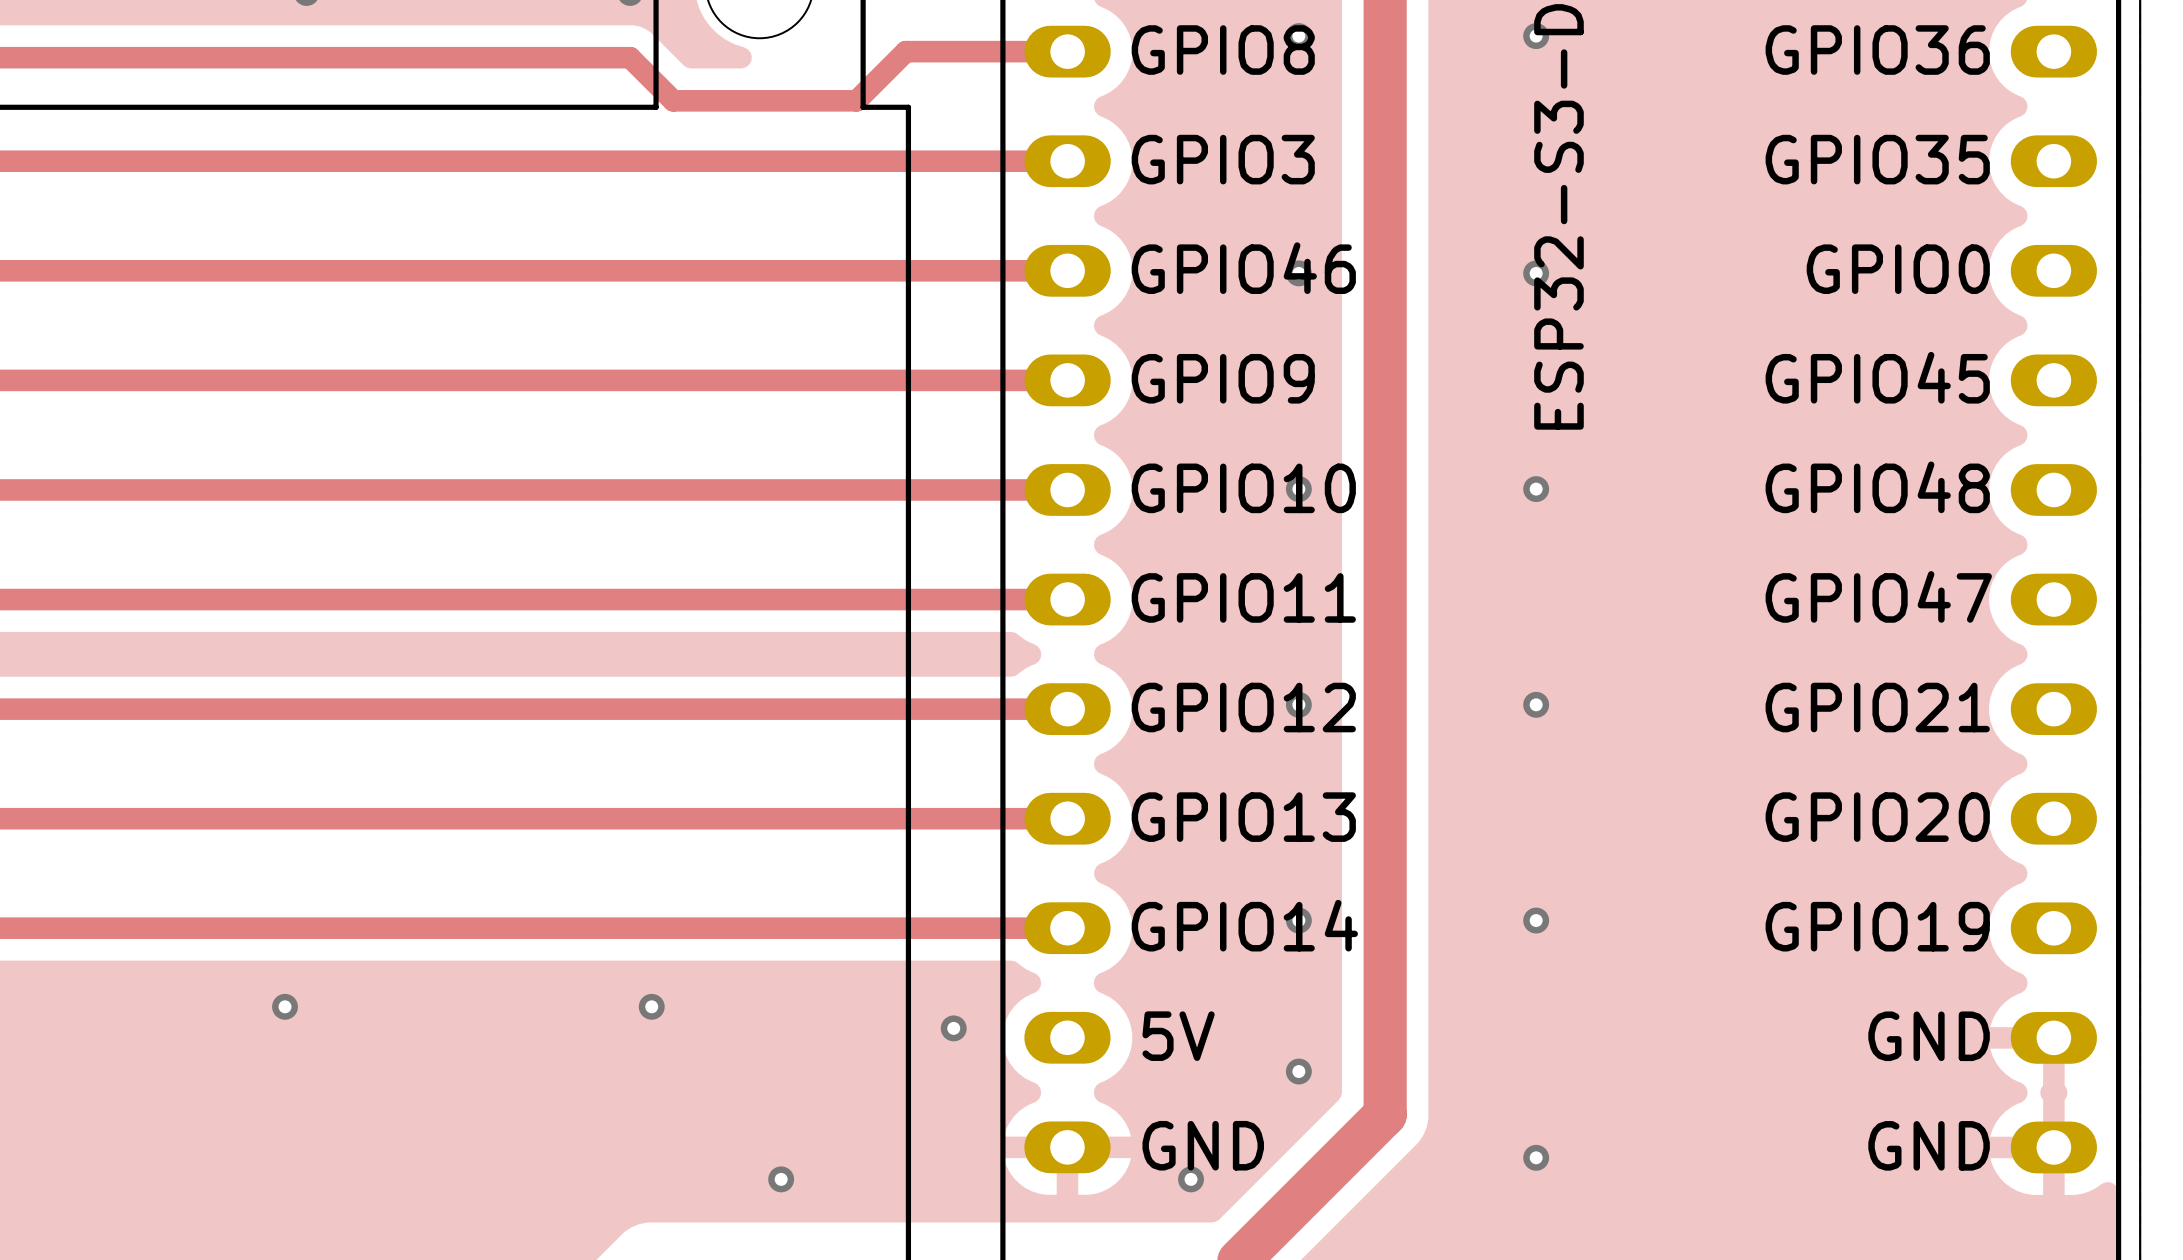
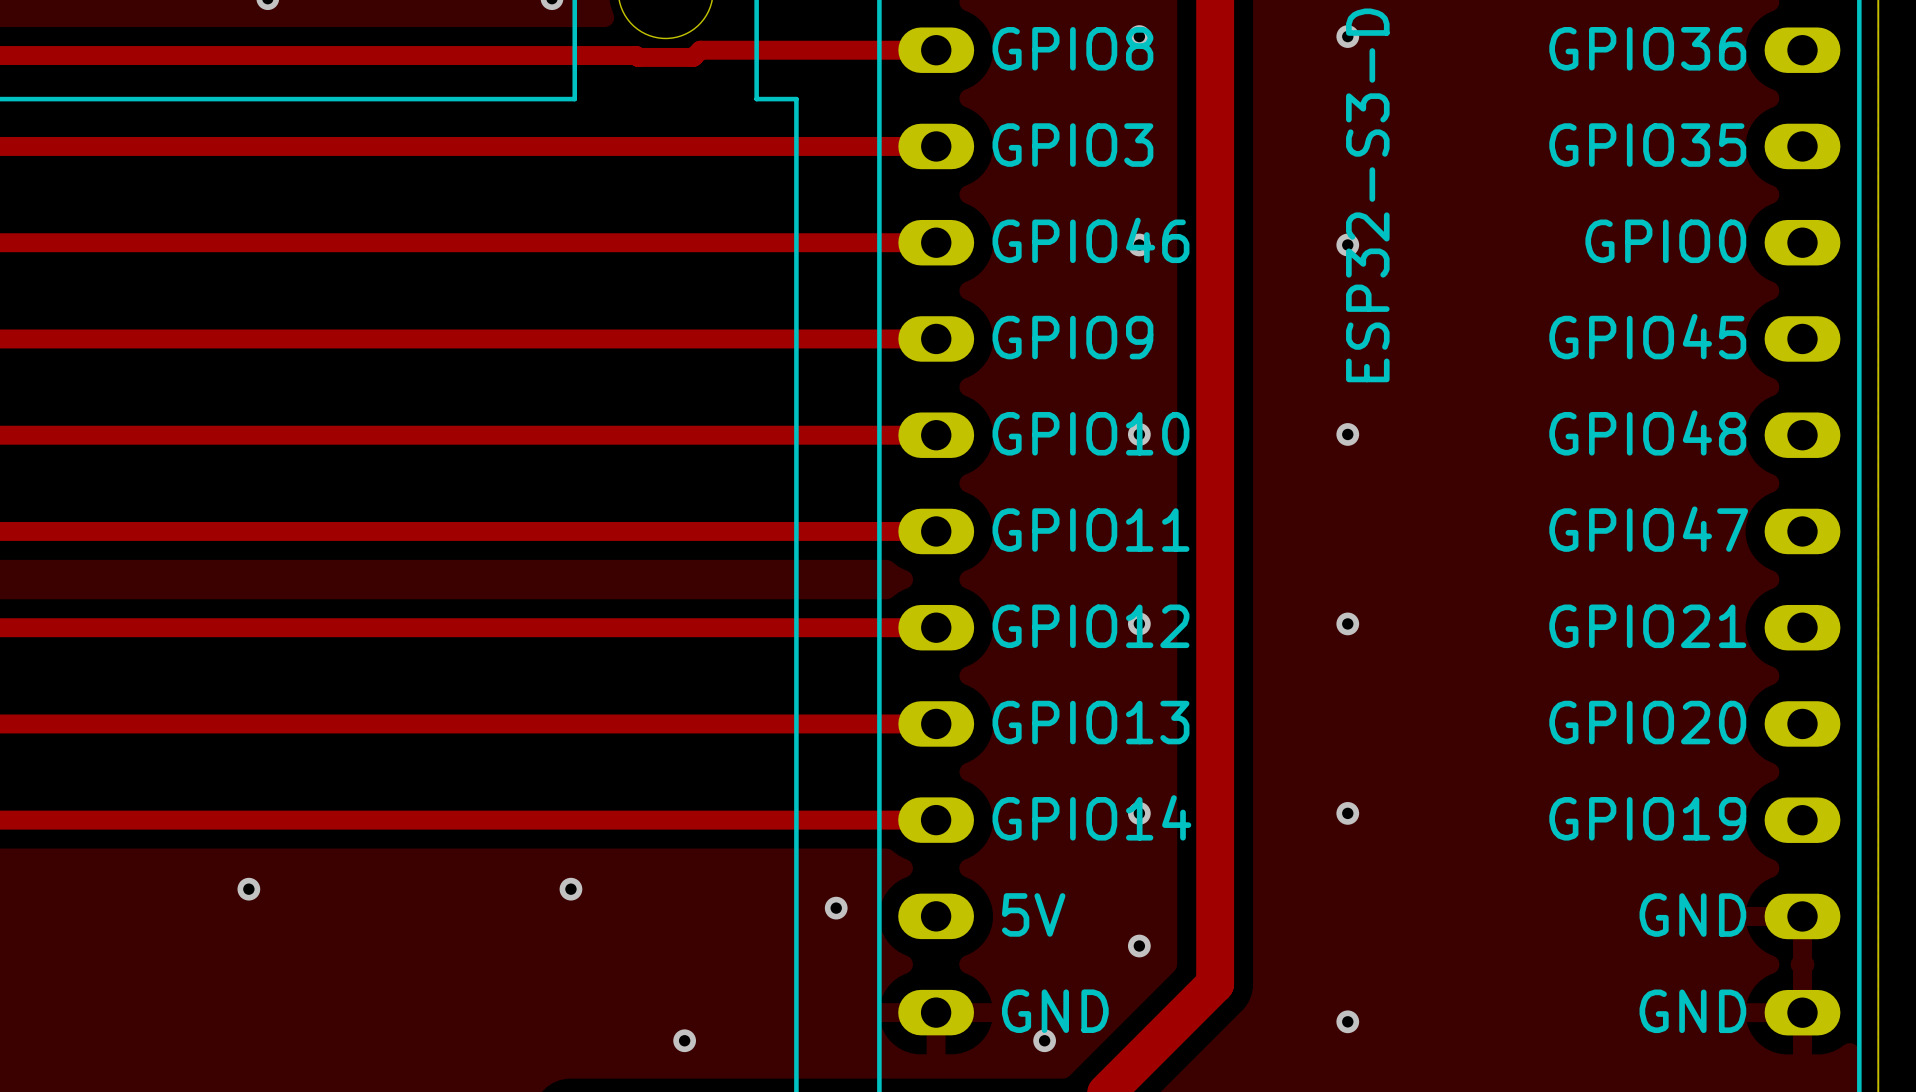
track: (905, 51) (856, 100) (673, 100) (630, 57) -> (794, 50) (700, 50) (693, 57) (552, 55)

